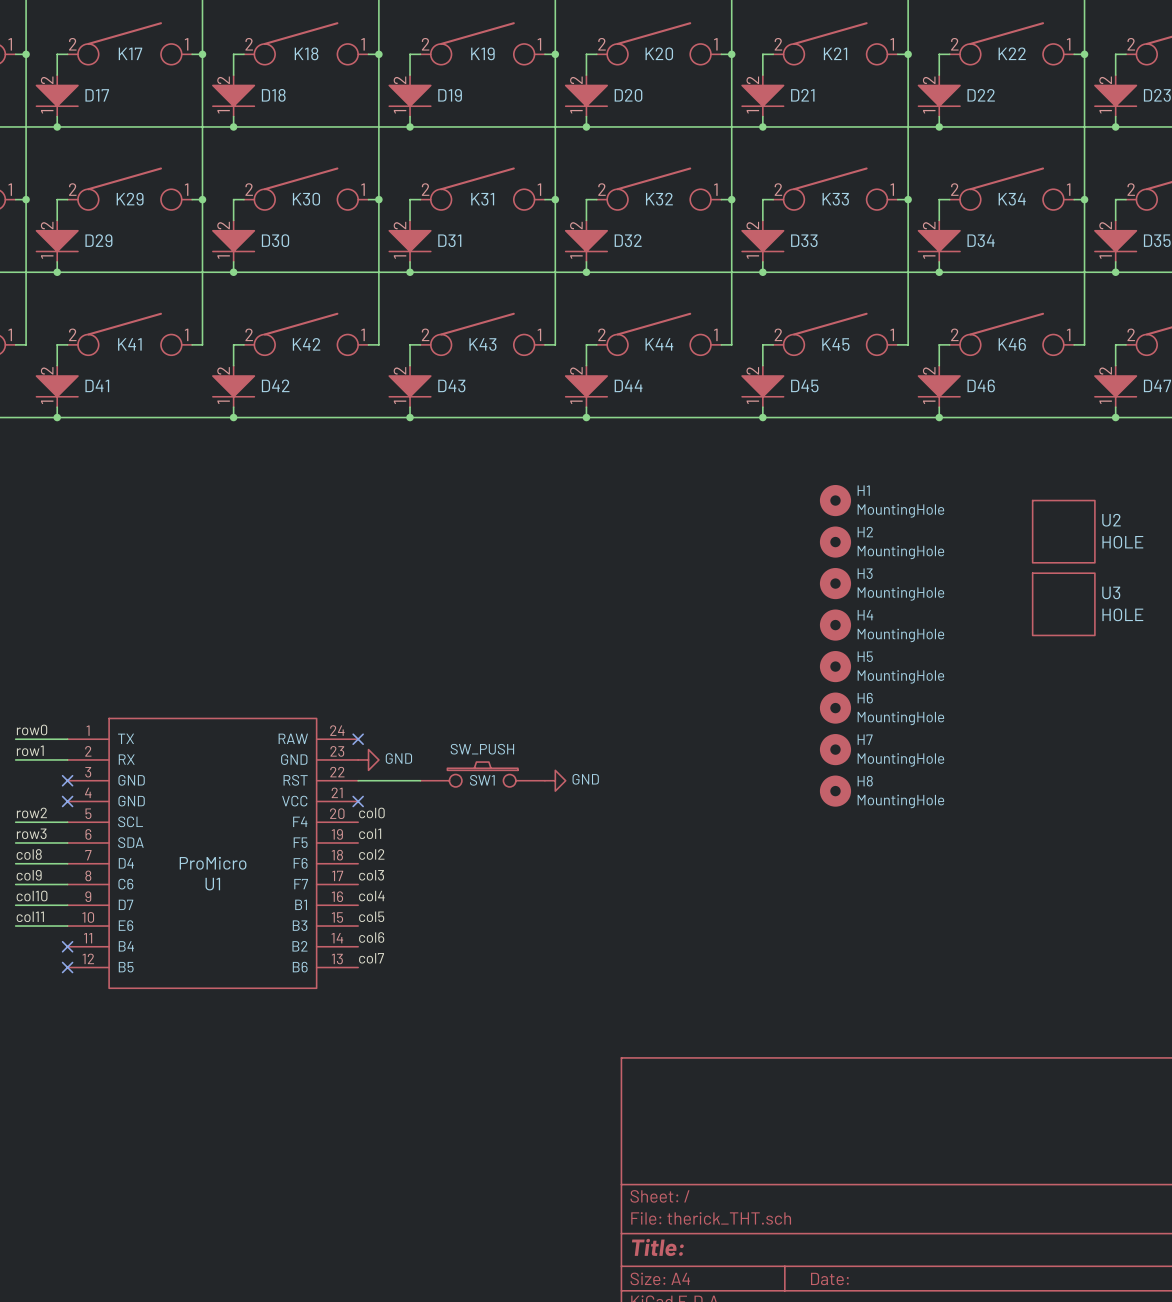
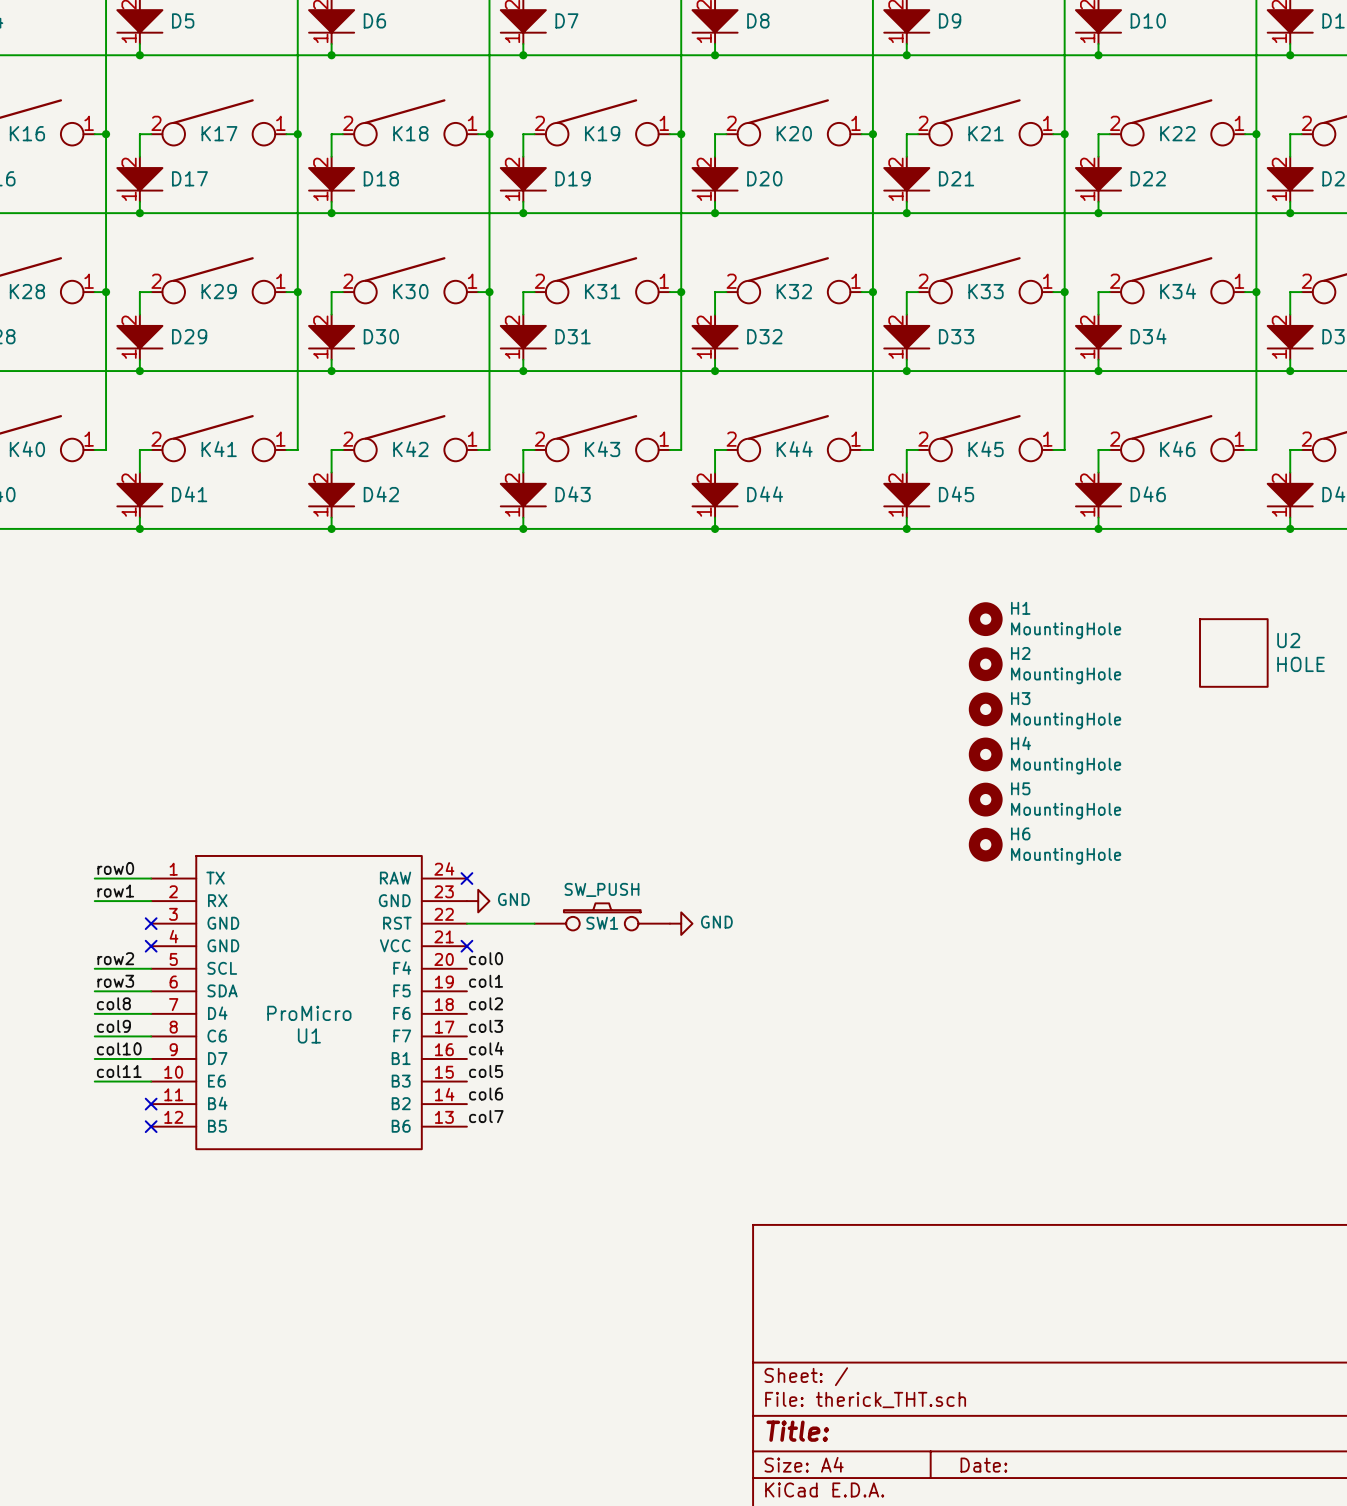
U3: HOLE (1063, 604) -> none
H7: MountingHole (835, 749) -> none
H8: MountingHole (835, 791) -> none

